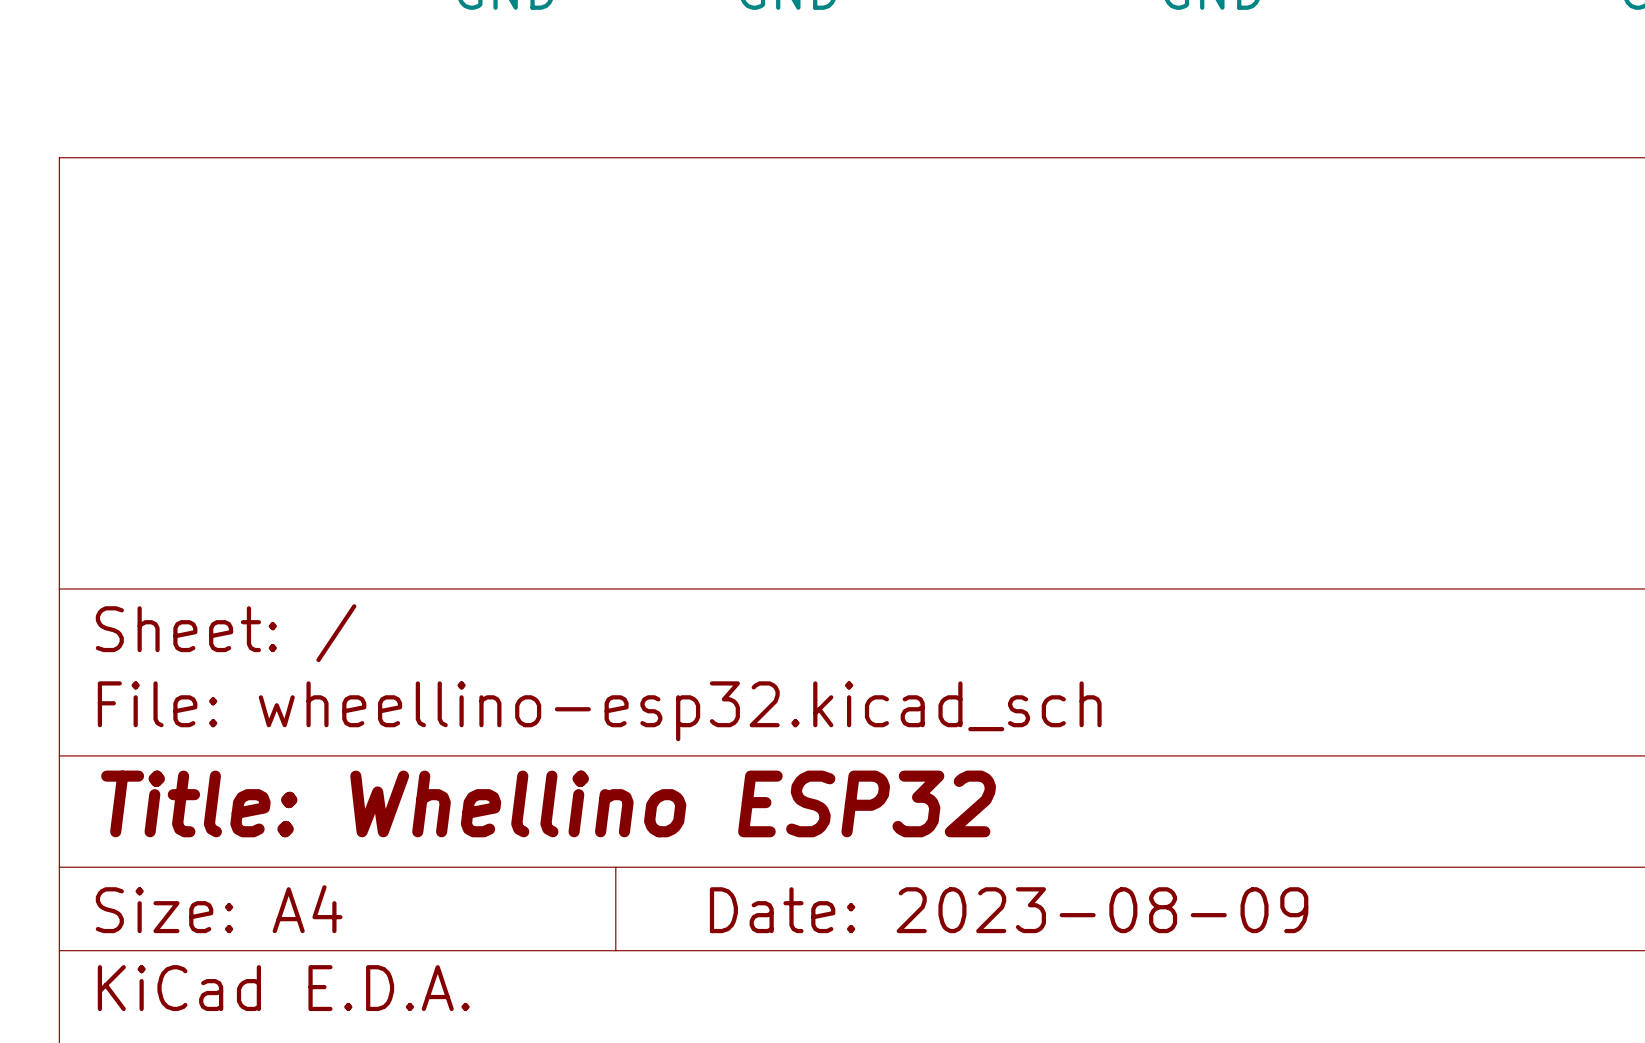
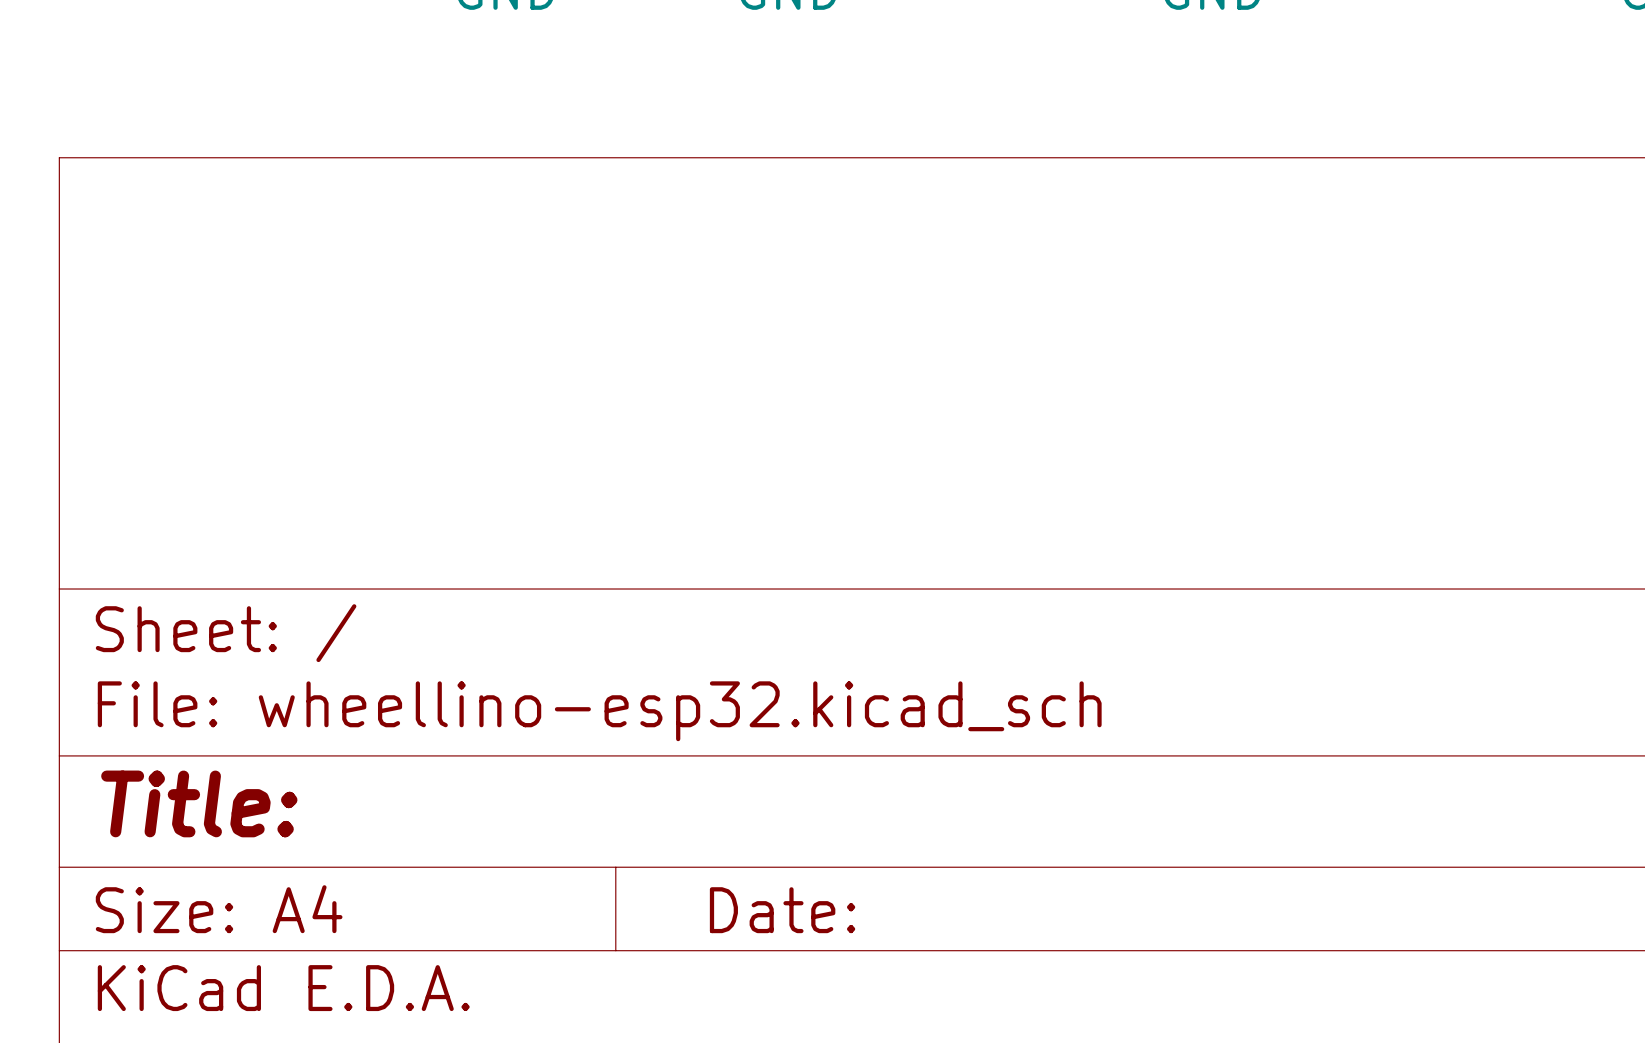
title block: Title: Whellino ESP32 (548, 803) -> Title: (199, 803)
title block: Date: 2023-08-09 (1009, 910) -> Date: (782, 910)

